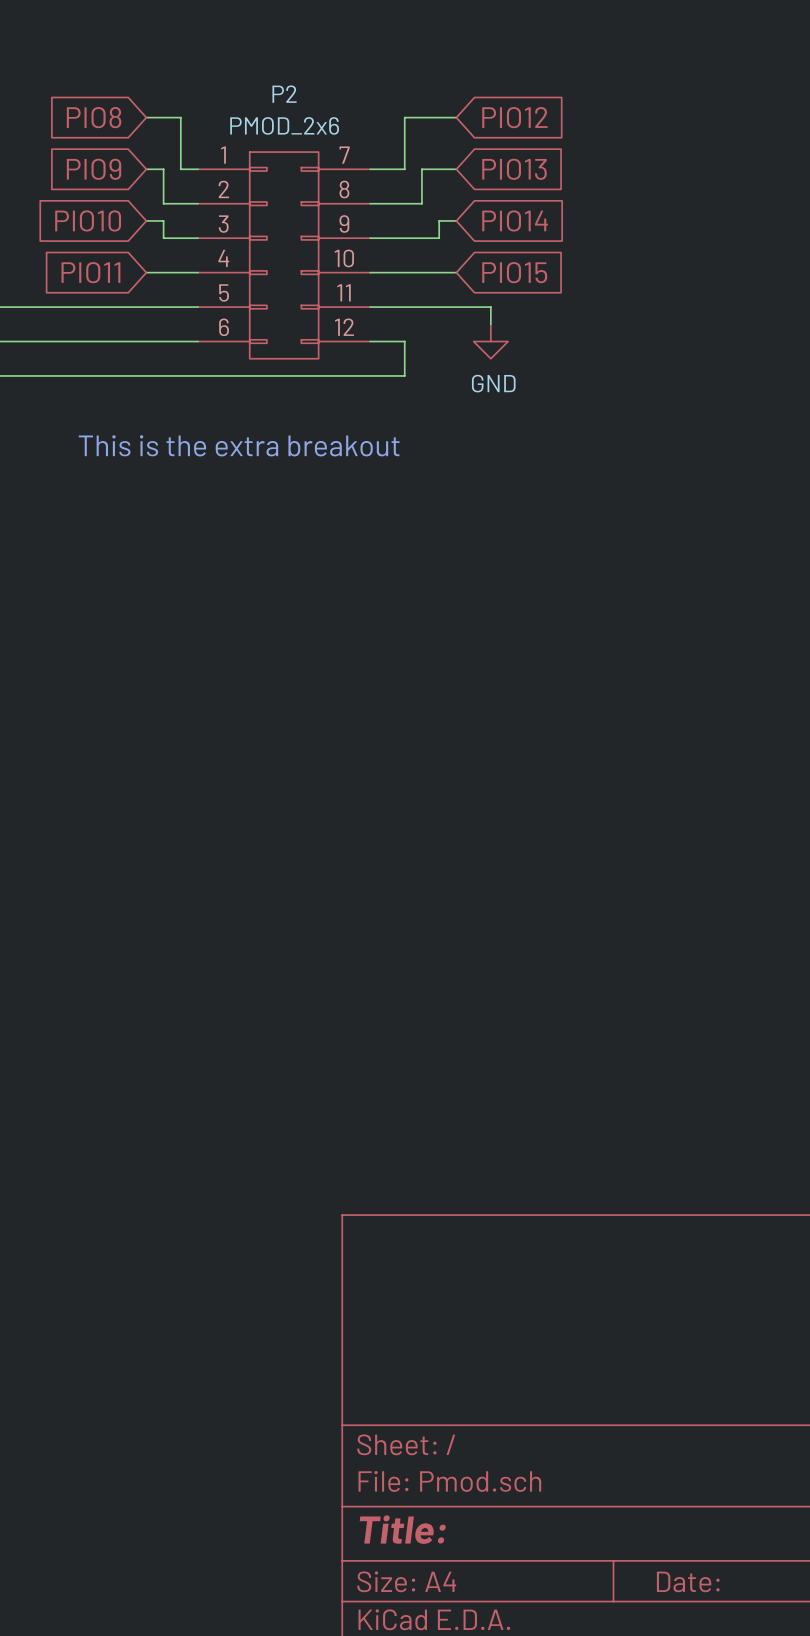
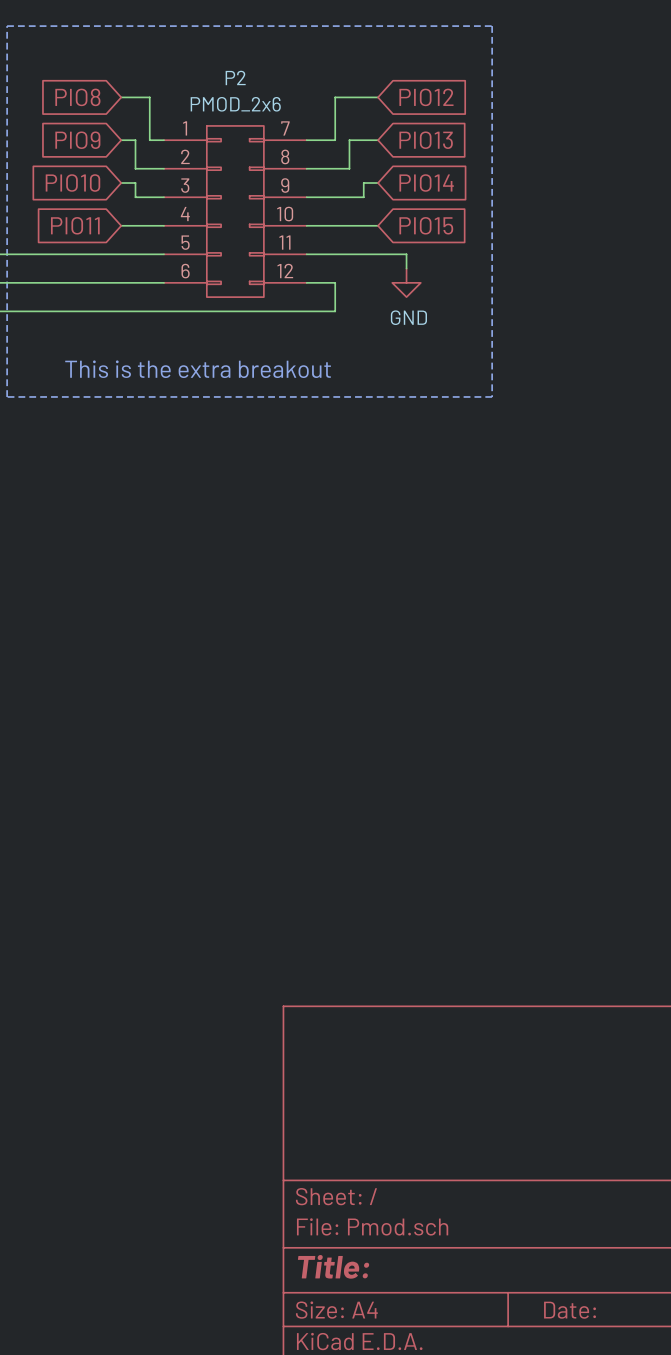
line: none -> (7, 26) (492, 26) (492, 396) (7, 396) (7, 26)

